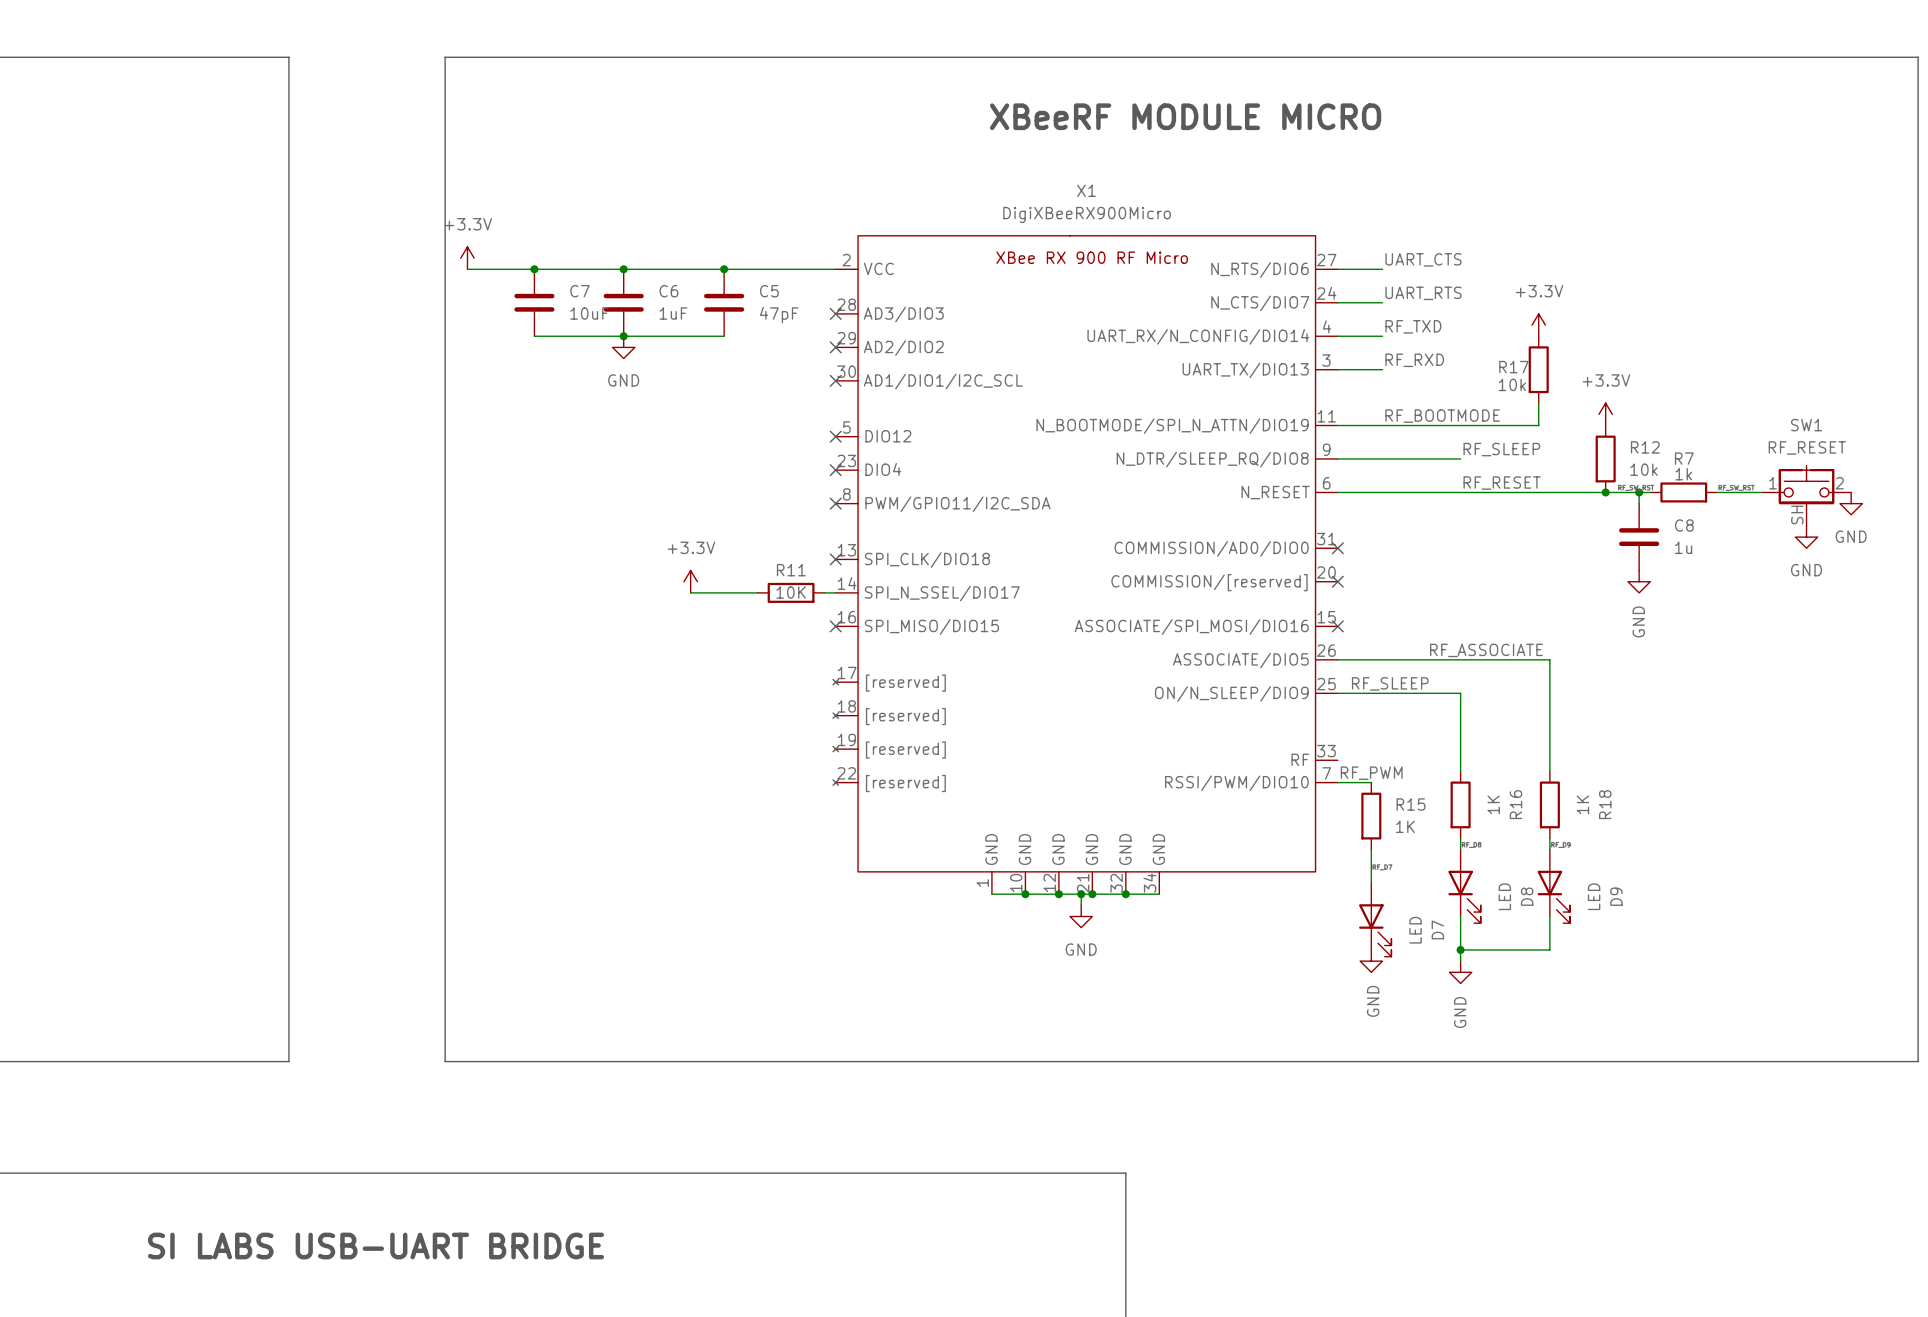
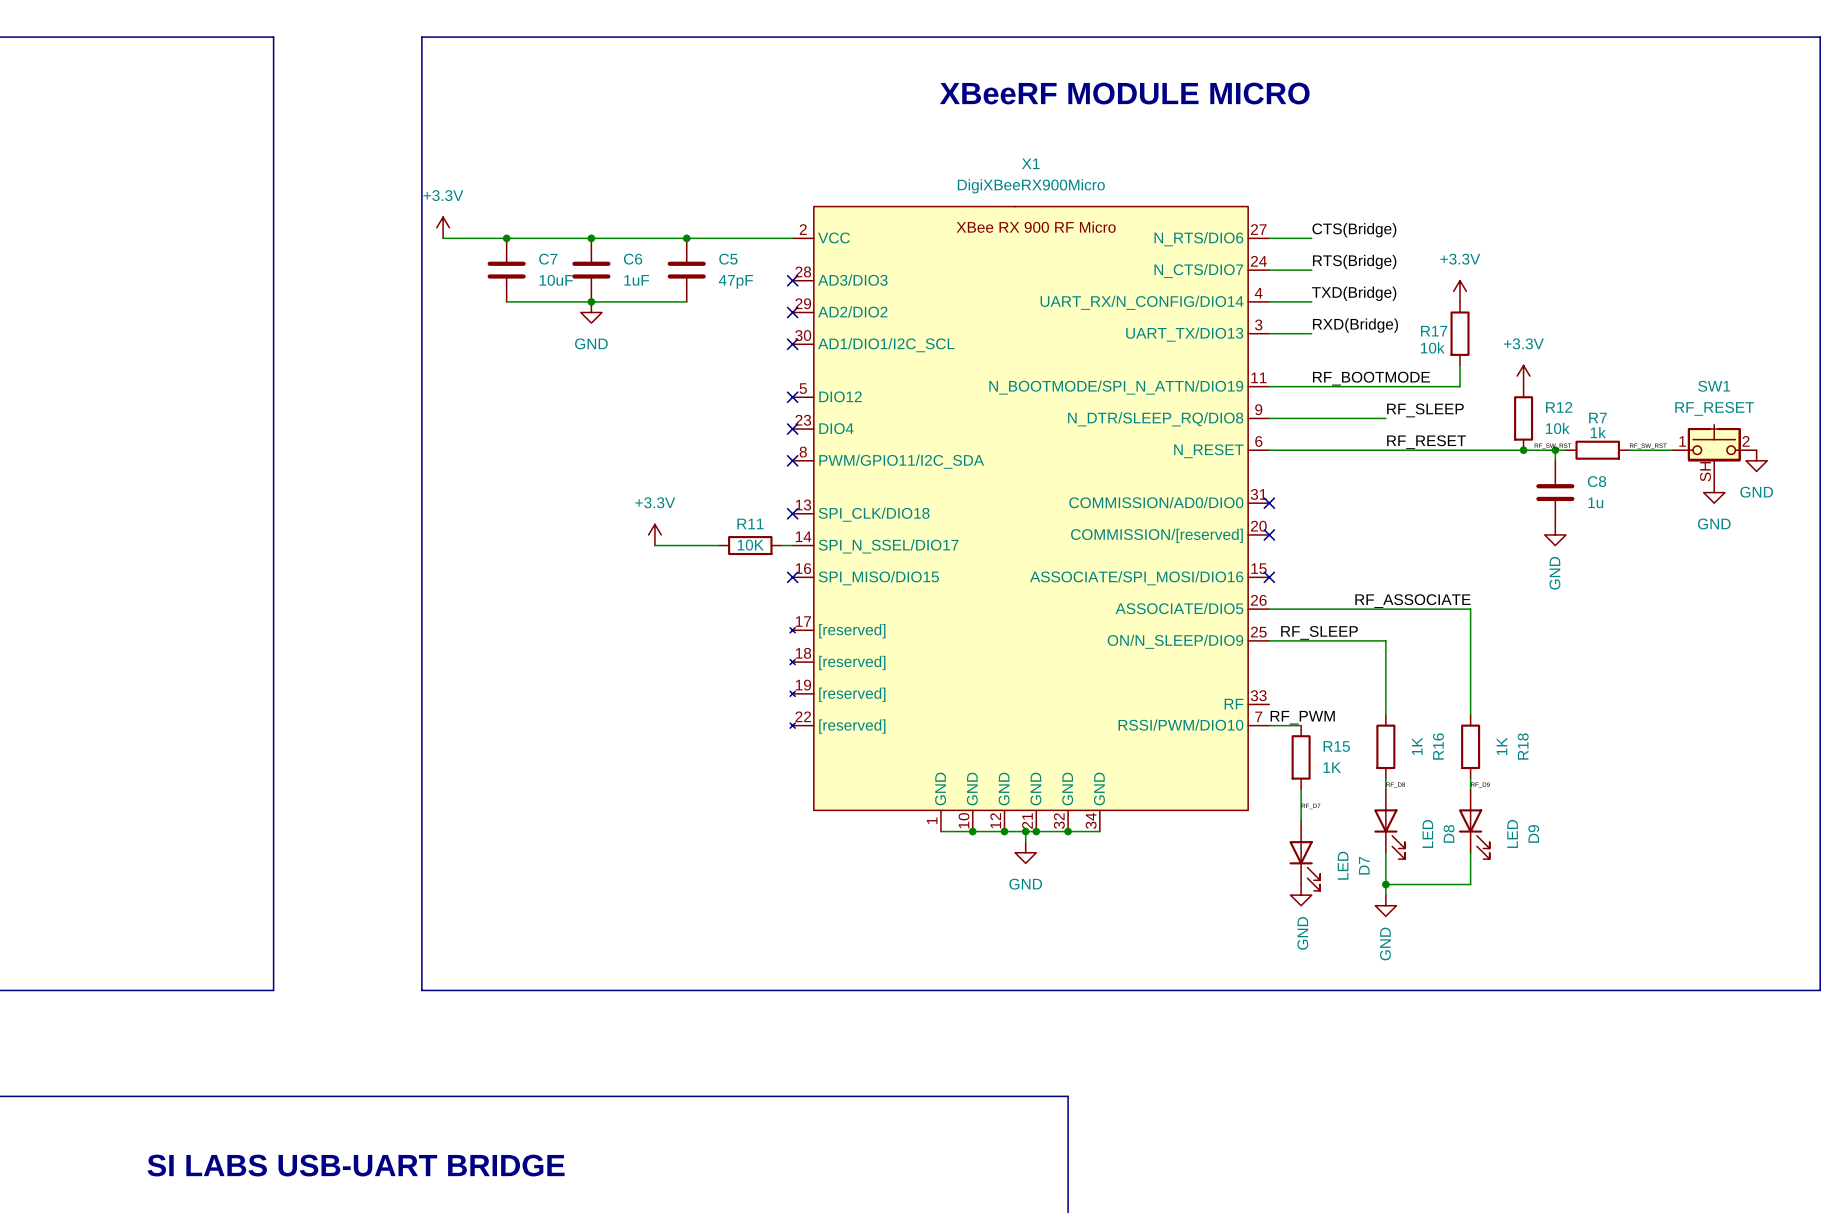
label: UART_CTS (1423, 259) -> CTS(Bridge) (1354, 230)
label: UART_RTS (1423, 293) -> RTS(Bridge) (1354, 262)
label: RF_TXD (1413, 326) -> TXD(Bridge) (1354, 293)
label: RF_RXD (1414, 360) -> RXD(Bridge) (1355, 325)

